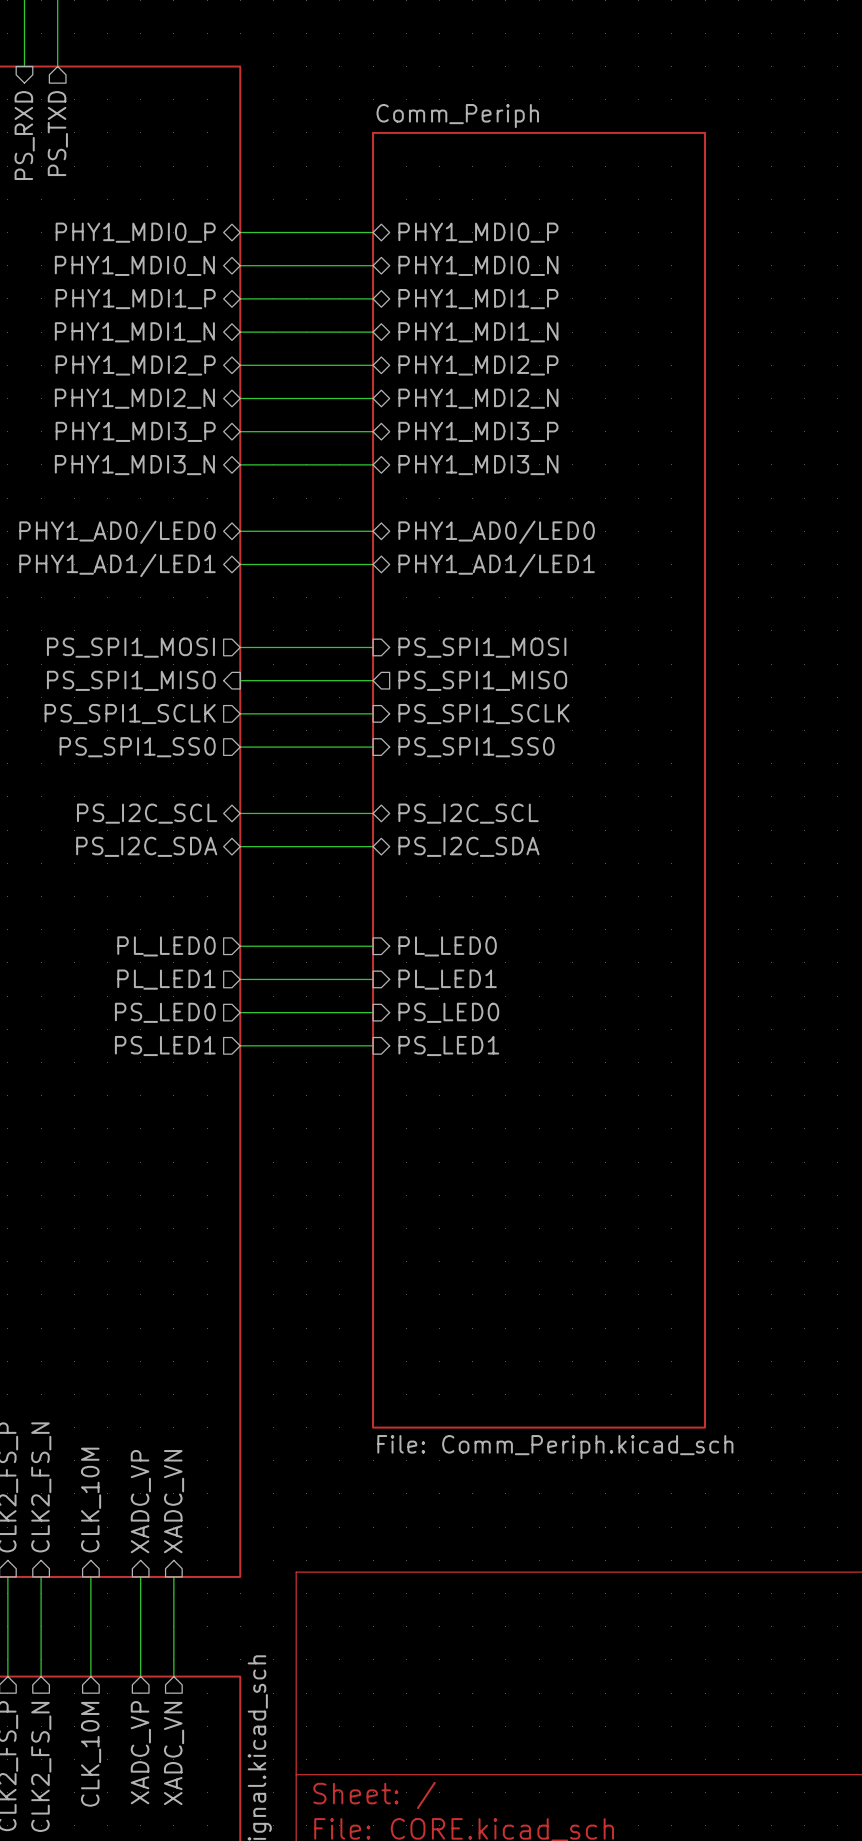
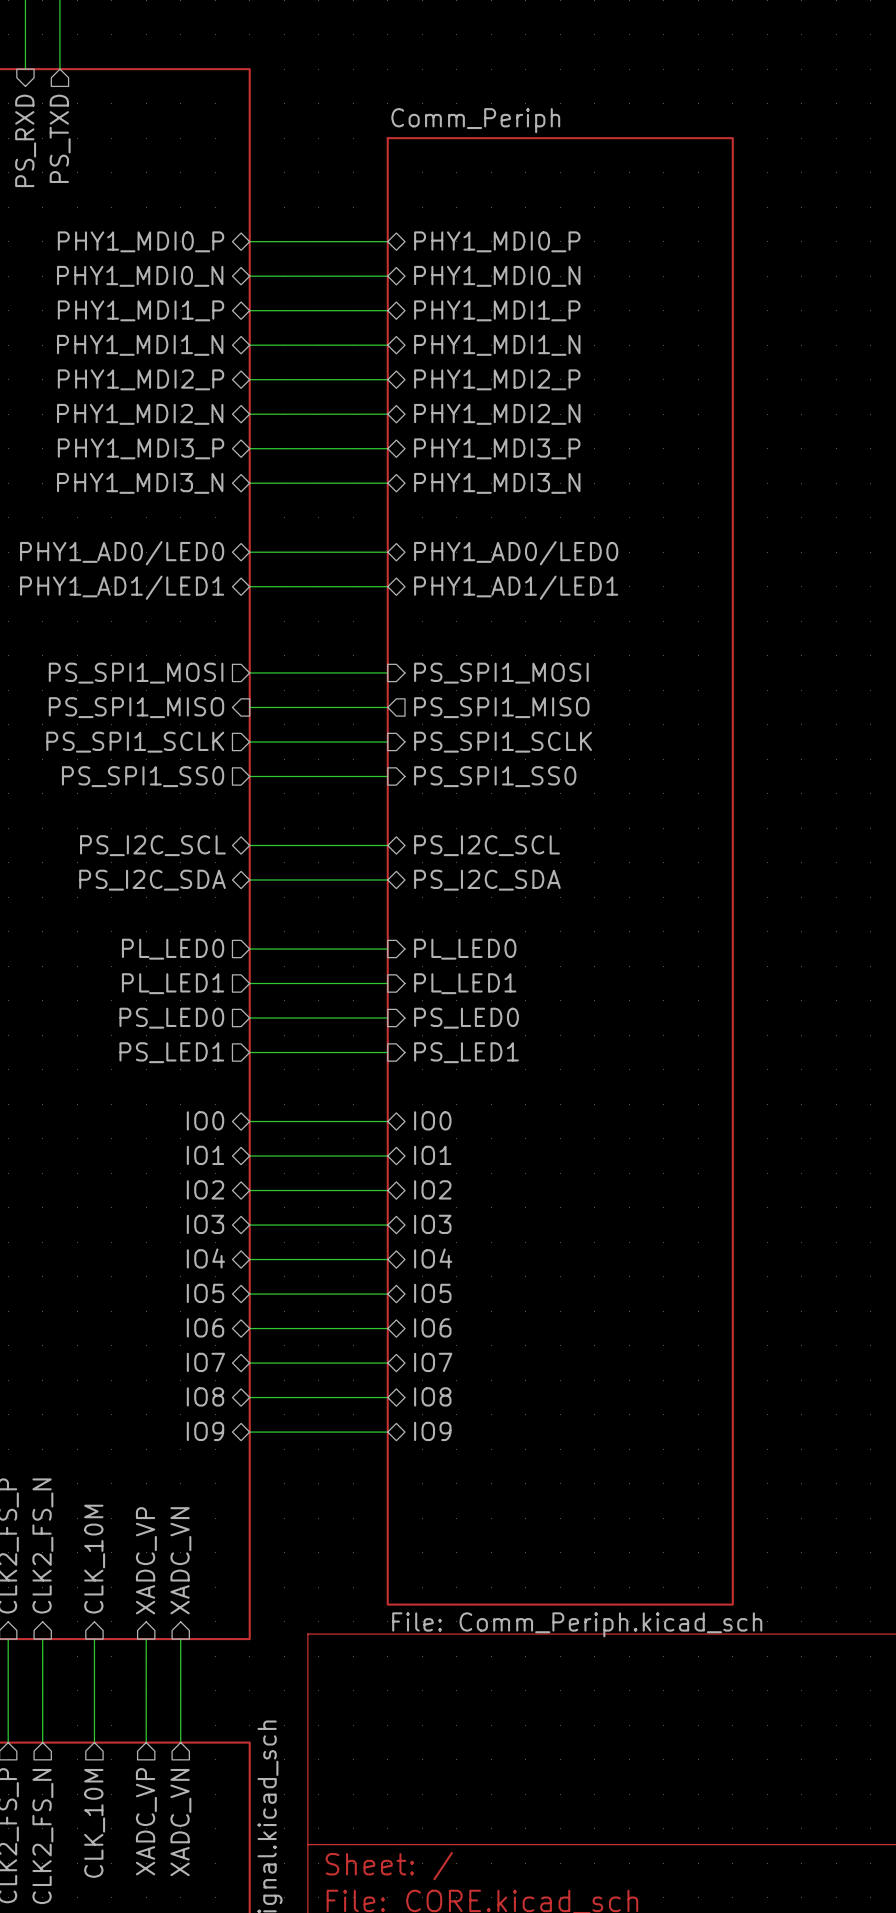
sheet Comm_Periph: File: Comm_Periph.kicad_sch (539, 780) -> none
sheet Comm_Periph: none -> File: Comm_Periph.kicad_sch (560, 871)
sheet pin: none -> PL_LED0 (173, 949)
wire: none -> (249, 949) (387, 949)
sheet pin: none -> PL_LED0 (465, 949)
sheet pin: PL_LED0 (166, 946) -> PL_LED1 (173, 983)
sheet pin: PL_LED0 (447, 946) -> PL_LED1 (465, 983)
sheet pin: PL_LED1 (166, 979) -> PS_LED0 (171, 1018)
sheet pin: PL_LED1 (447, 979) -> PS_LED0 (466, 1018)
sheet pin: PS_LED0 (165, 1012) -> PS_LED1 (171, 1052)
sheet pin: PS_LED0 (448, 1012) -> PS_LED1 (466, 1052)
wire: (240, 1045) (373, 1045) -> (249, 1121) (387, 1121)
sheet pin: PS_LED1 (165, 1046) -> none
sheet pin: PS_LED1 (448, 1046) -> none
sheet pin: none -> IO0 (205, 1120)
sheet pin: none -> IO0 (432, 1120)
sheet pin: none -> IO1 (205, 1155)
sheet pin: none -> IO1 (432, 1155)
wire: none -> (249, 1156) (387, 1156)
sheet pin: none -> IO2 (205, 1189)
sheet pin: none -> IO2 (432, 1189)
wire: none -> (249, 1190) (387, 1190)
sheet pin: none -> IO3 (205, 1224)
sheet pin: none -> IO3 (432, 1224)
wire: none -> (249, 1225) (387, 1225)
sheet pin: none -> IO4 (205, 1258)
sheet pin: none -> IO4 (433, 1258)
wire: none -> (249, 1259) (387, 1259)
sheet pin: none -> IO5 (205, 1293)
sheet pin: none -> IO5 (432, 1293)
wire: none -> (249, 1294) (387, 1294)
sheet pin: none -> IO6 (205, 1327)
sheet pin: none -> IO6 (432, 1327)
wire: none -> (249, 1328) (387, 1328)
sheet pin: none -> IO7 (205, 1362)
sheet pin: none -> IO7 (433, 1362)
wire: none -> (249, 1363) (387, 1363)
sheet pin: none -> IO8 (205, 1396)
sheet pin: none -> IO8 (432, 1396)
wire: none -> (249, 1397) (387, 1397)
sheet pin: none -> IO9 (205, 1431)
wire: none -> (249, 1432) (387, 1432)
sheet pin: none -> IO9 (432, 1431)

